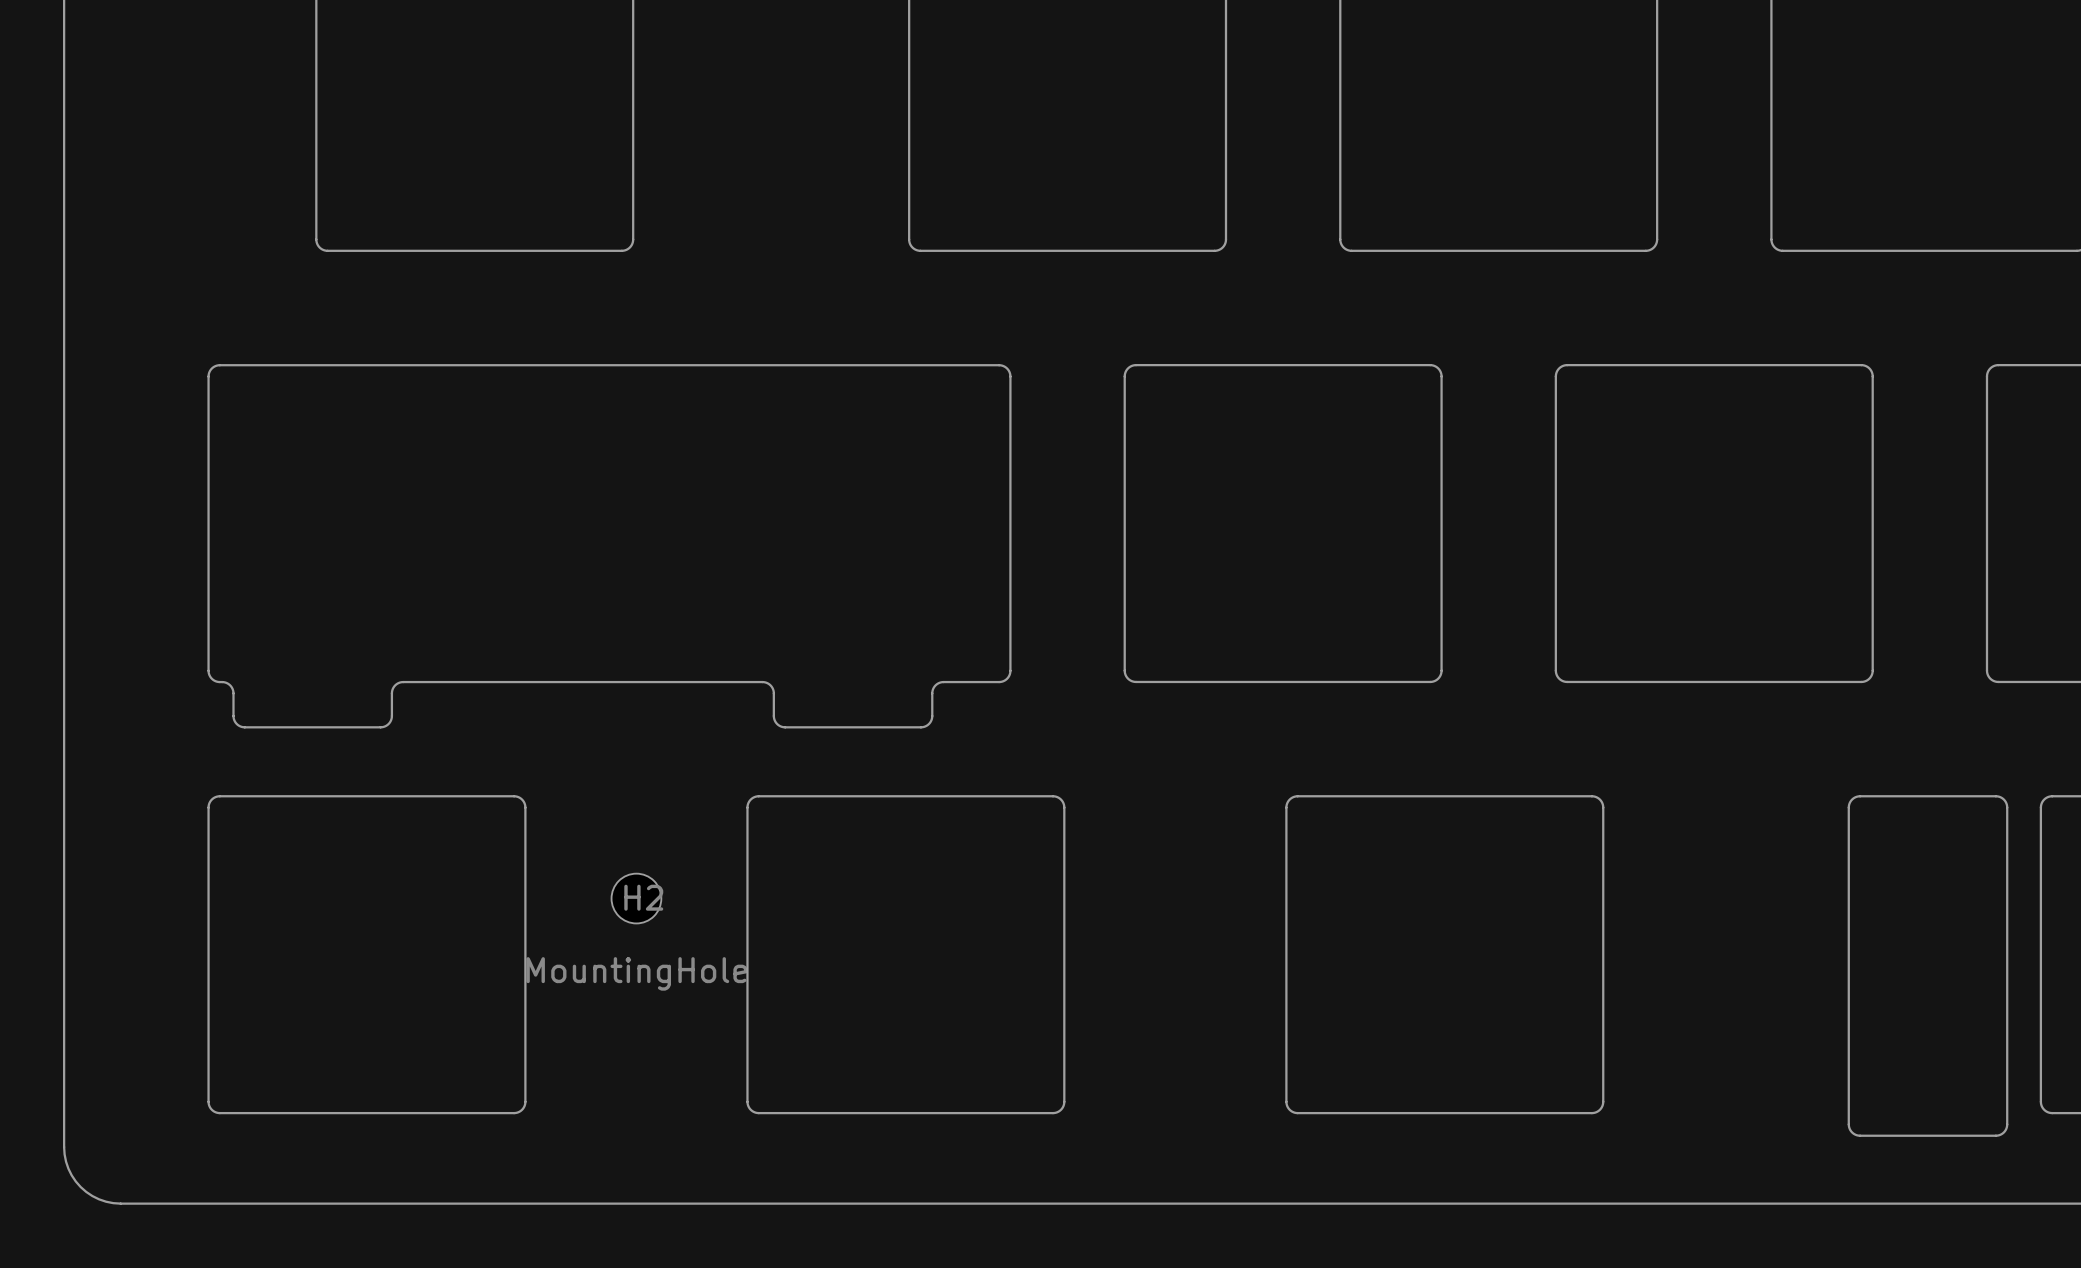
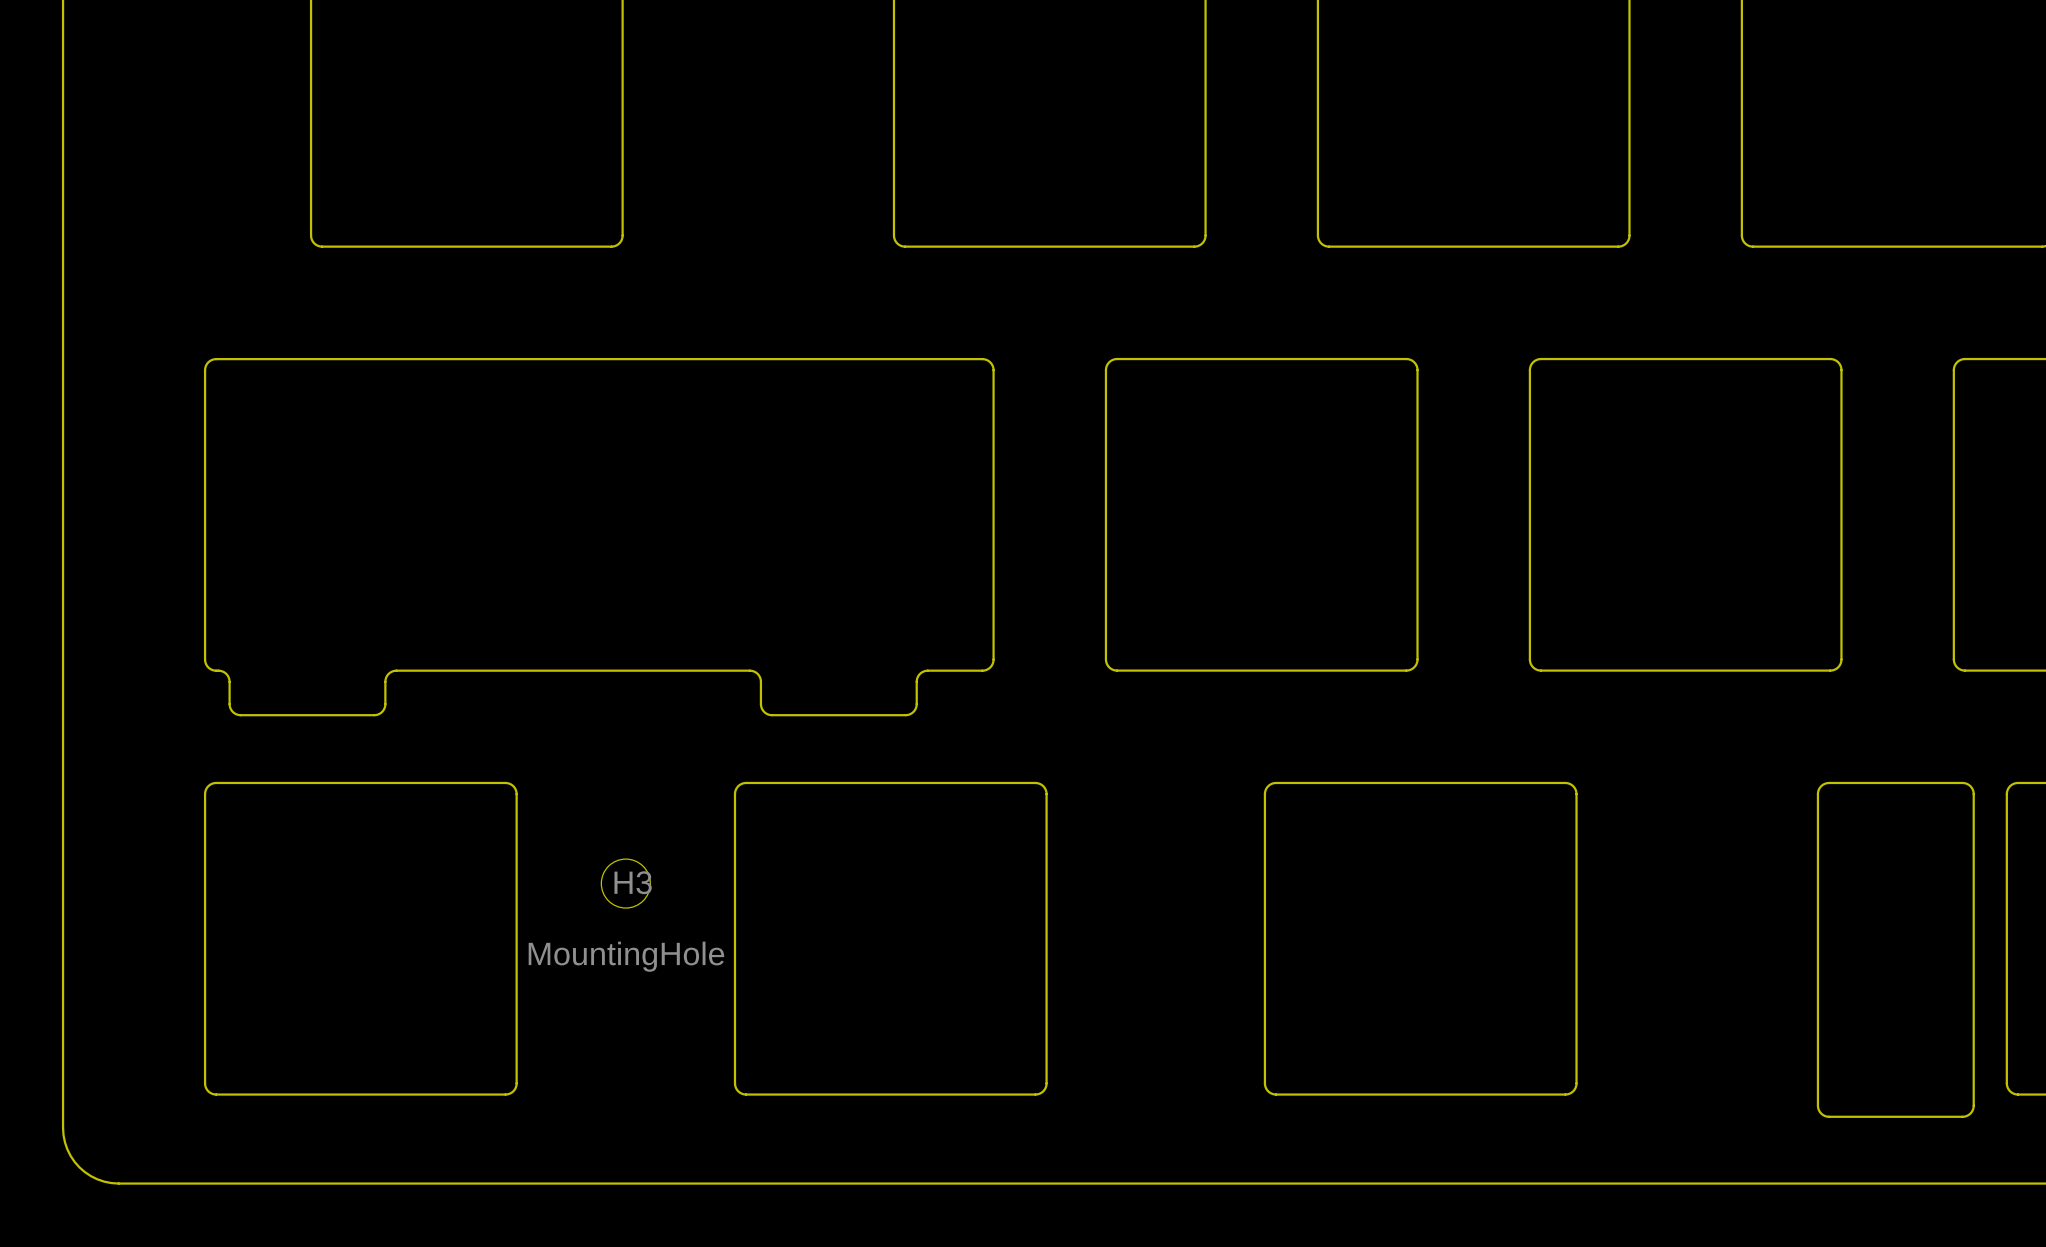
H2 name: H2 (643, 897) -> H3 (633, 882)

